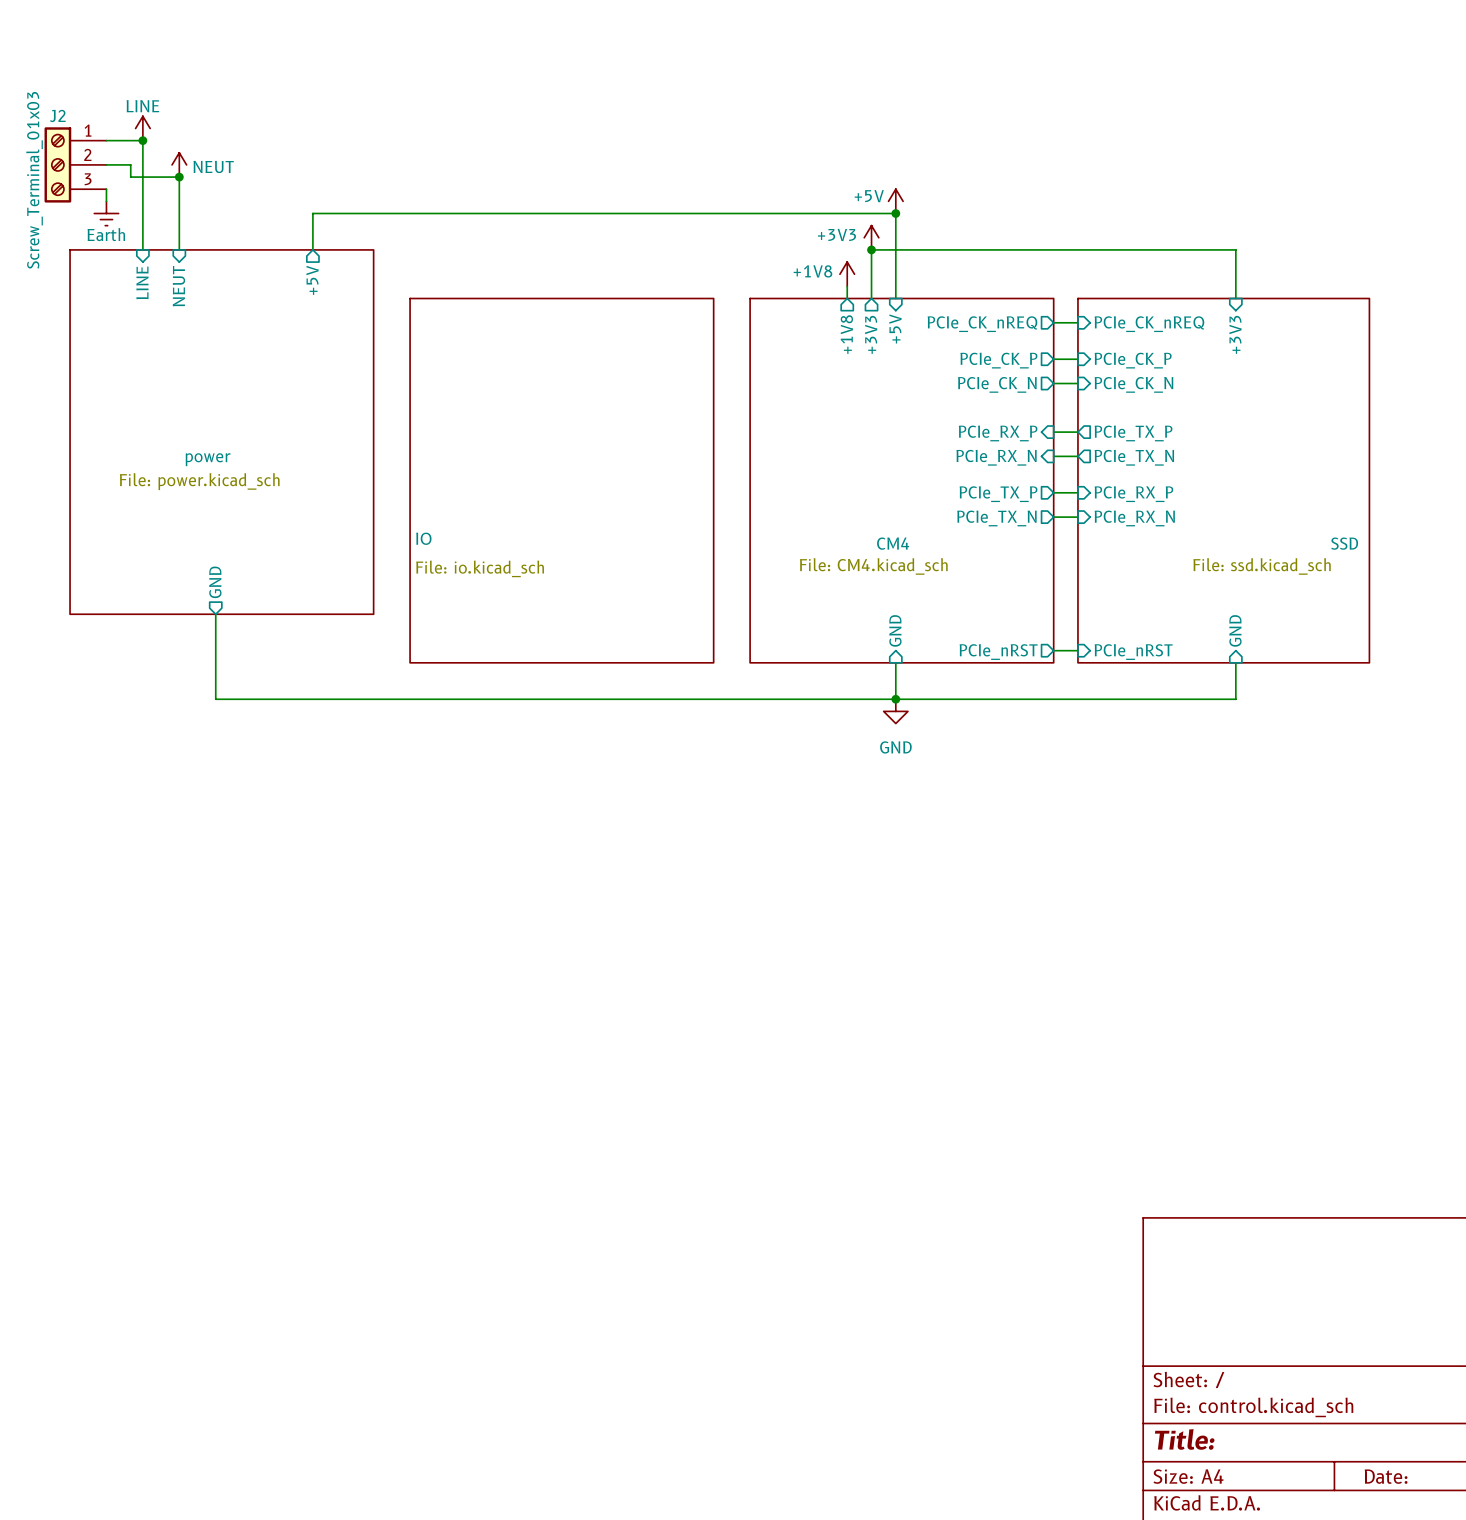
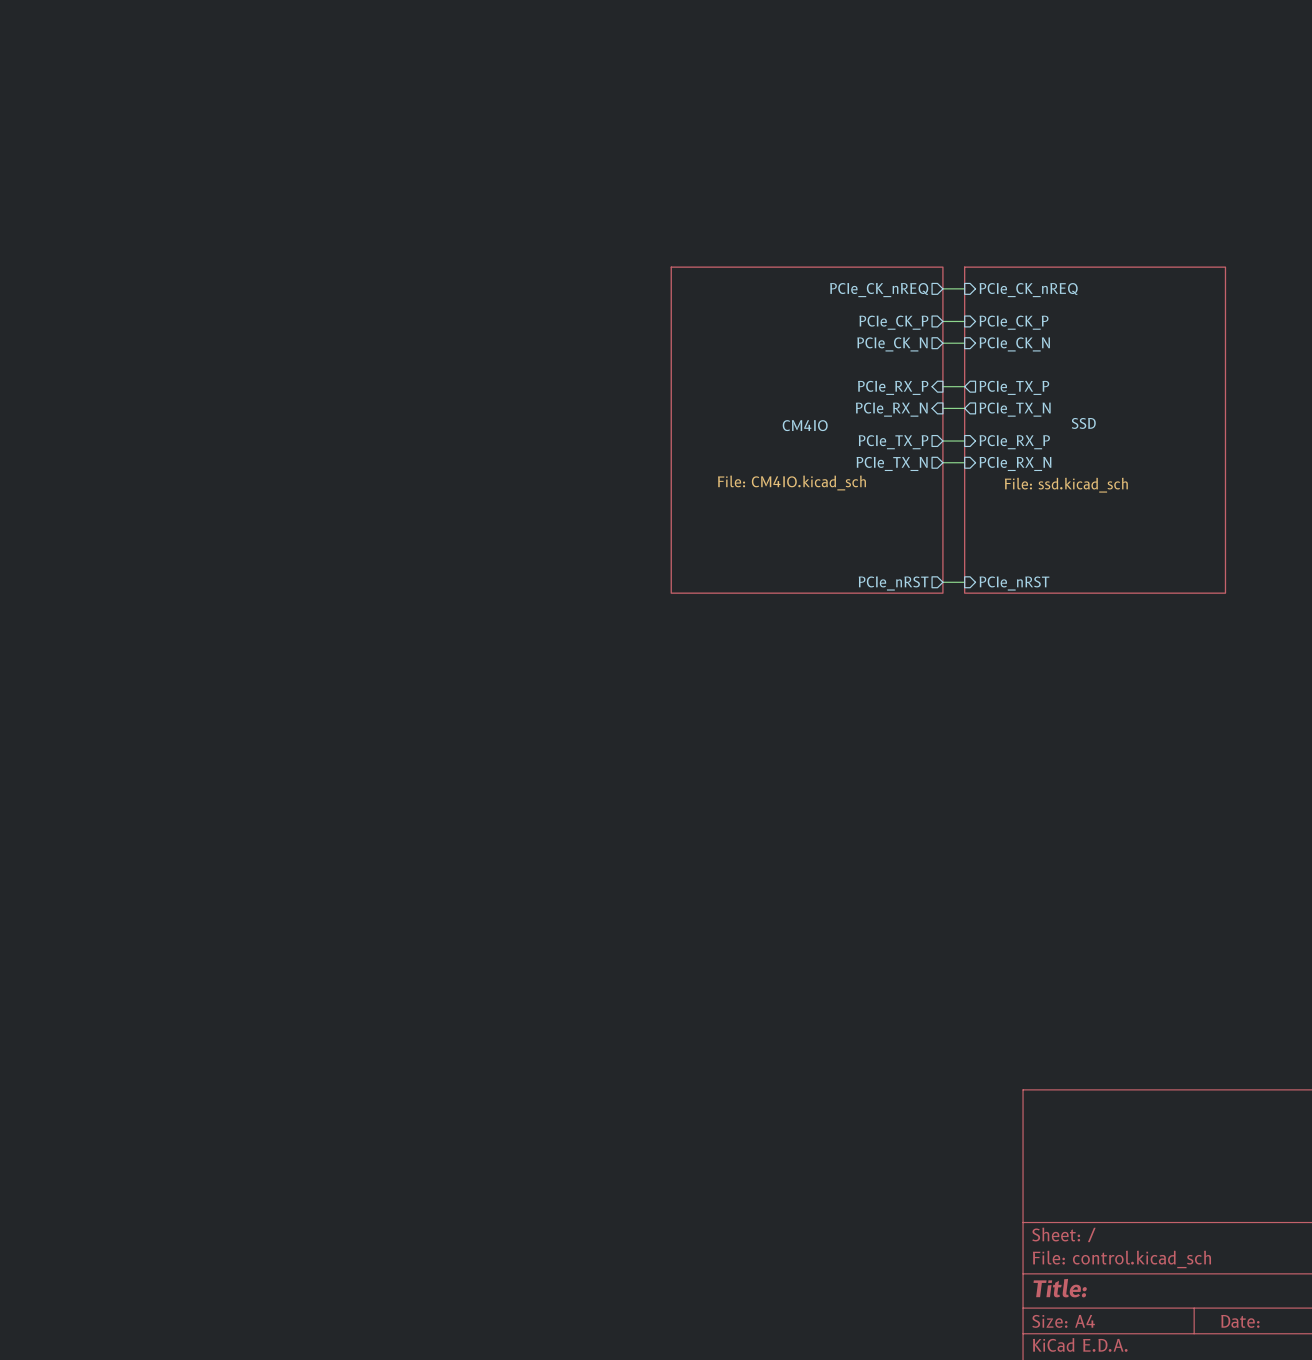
power symbol: LINE (142, 128) -> none
wire: (106, 140) (142, 140) (142, 249) -> none
junction: (142, 140) -> none
J2: Screw_Terminal_01x03 (75, 164) -> none
wire: (106, 164) (130, 164) (130, 177) (179, 177) (179, 249) -> none
power symbol: NEUT (179, 164) -> none
junction: (179, 177) -> none
wire: (106, 189) (106, 201) -> none
power symbol: +5V (895, 201) -> none
power symbol: Earth (106, 213) -> none
junction: (895, 213) -> none
power symbol: +3V3 (871, 237) -> none
wire: (312, 249) (312, 213) (895, 213) (895, 298) -> none
junction: (871, 249) -> none
power symbol: +1V8 (847, 274) -> none
sheet pin: +5V (312, 280) -> none
sheet pin: LINE (142, 282) -> none
sheet pin: NEUT (178, 286) -> none
wire: (847, 286) (847, 298) -> none
wire: (871, 298) (871, 249) (1235, 249) (1235, 298) -> none
sheet pin: +5V (895, 328) -> none
sheet pin: +1V8 (846, 334) -> none
sheet pin: +3V3 (871, 334) -> none
sheet pin: +3V3 (1235, 334) -> none
sheet power: File: power.kicad_sch (221, 432) -> none
sheet IO: File: io.kicad_sch (561, 480) -> none
sheet CM4 name: CM4 (893, 543) -> CM4IO (805, 425)
sheet SSD name position: SSD (1344, 543) -> SSD (1083, 423)
sheet CM4 value: File: CM4.kicad_sch (873, 566) -> File: CM4IO.kicad_sch (791, 483)
sheet SSD value position: File: ssd.kicad_sch (1262, 566) -> File: ssd.kicad_sch (1066, 485)
sheet pin: GND (215, 582) -> none
wire: (215, 614) (215, 699) (1235, 699) (1235, 662) -> none
sheet pin: GND (895, 630) -> none
sheet pin: GND (1235, 630) -> none
wire: (895, 662) (895, 699) -> none
junction: (895, 699) -> none
power symbol: GND (895, 711) -> none

